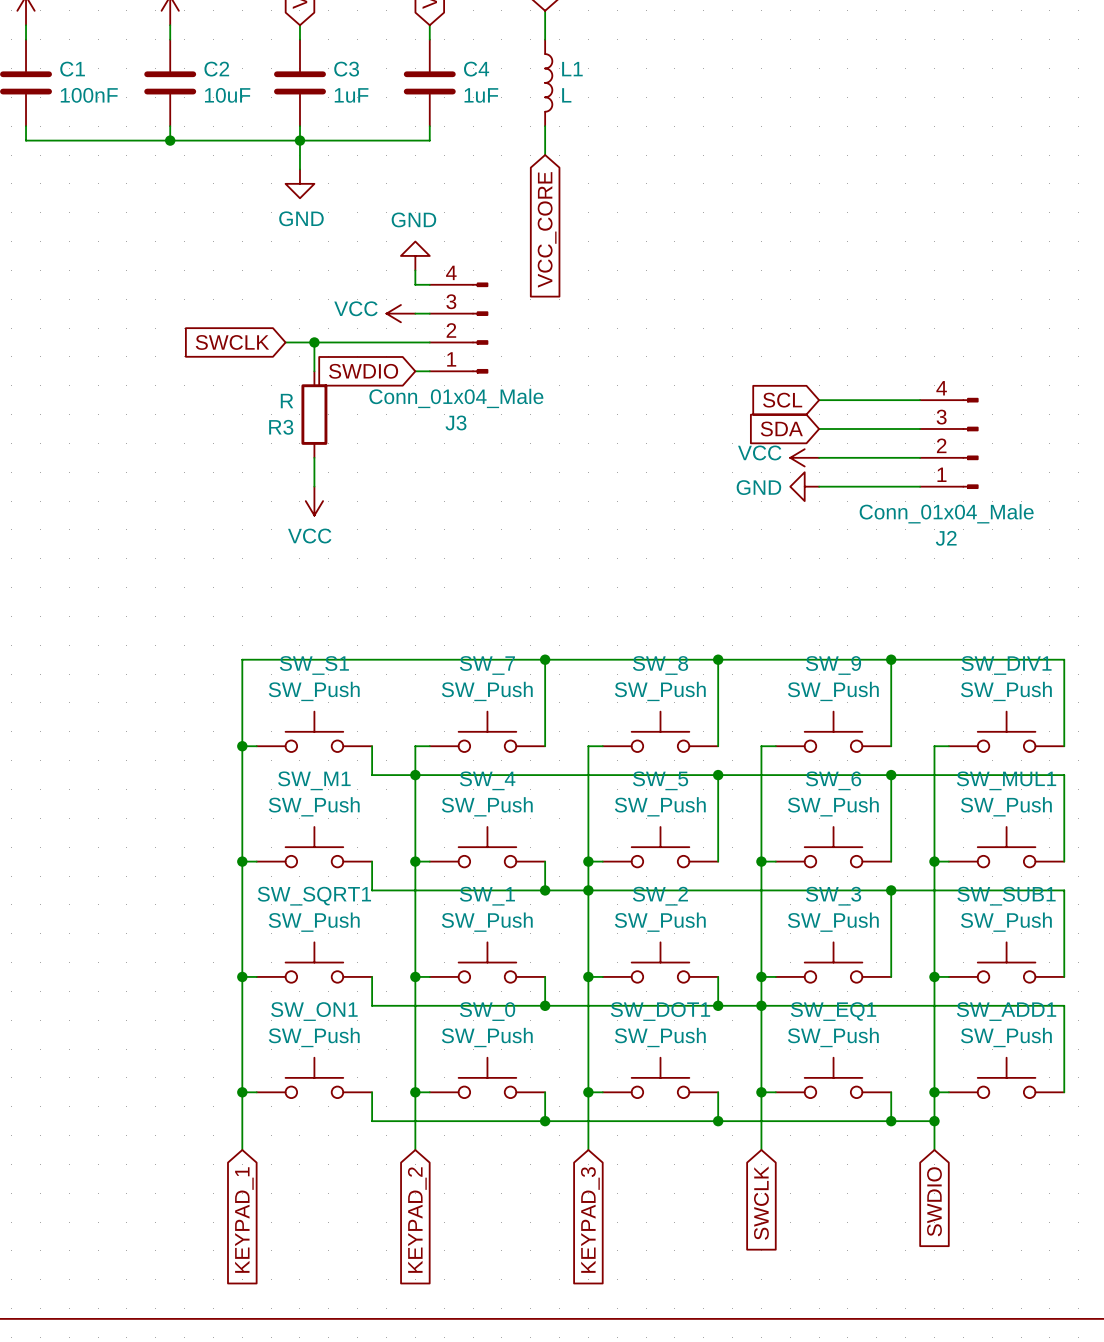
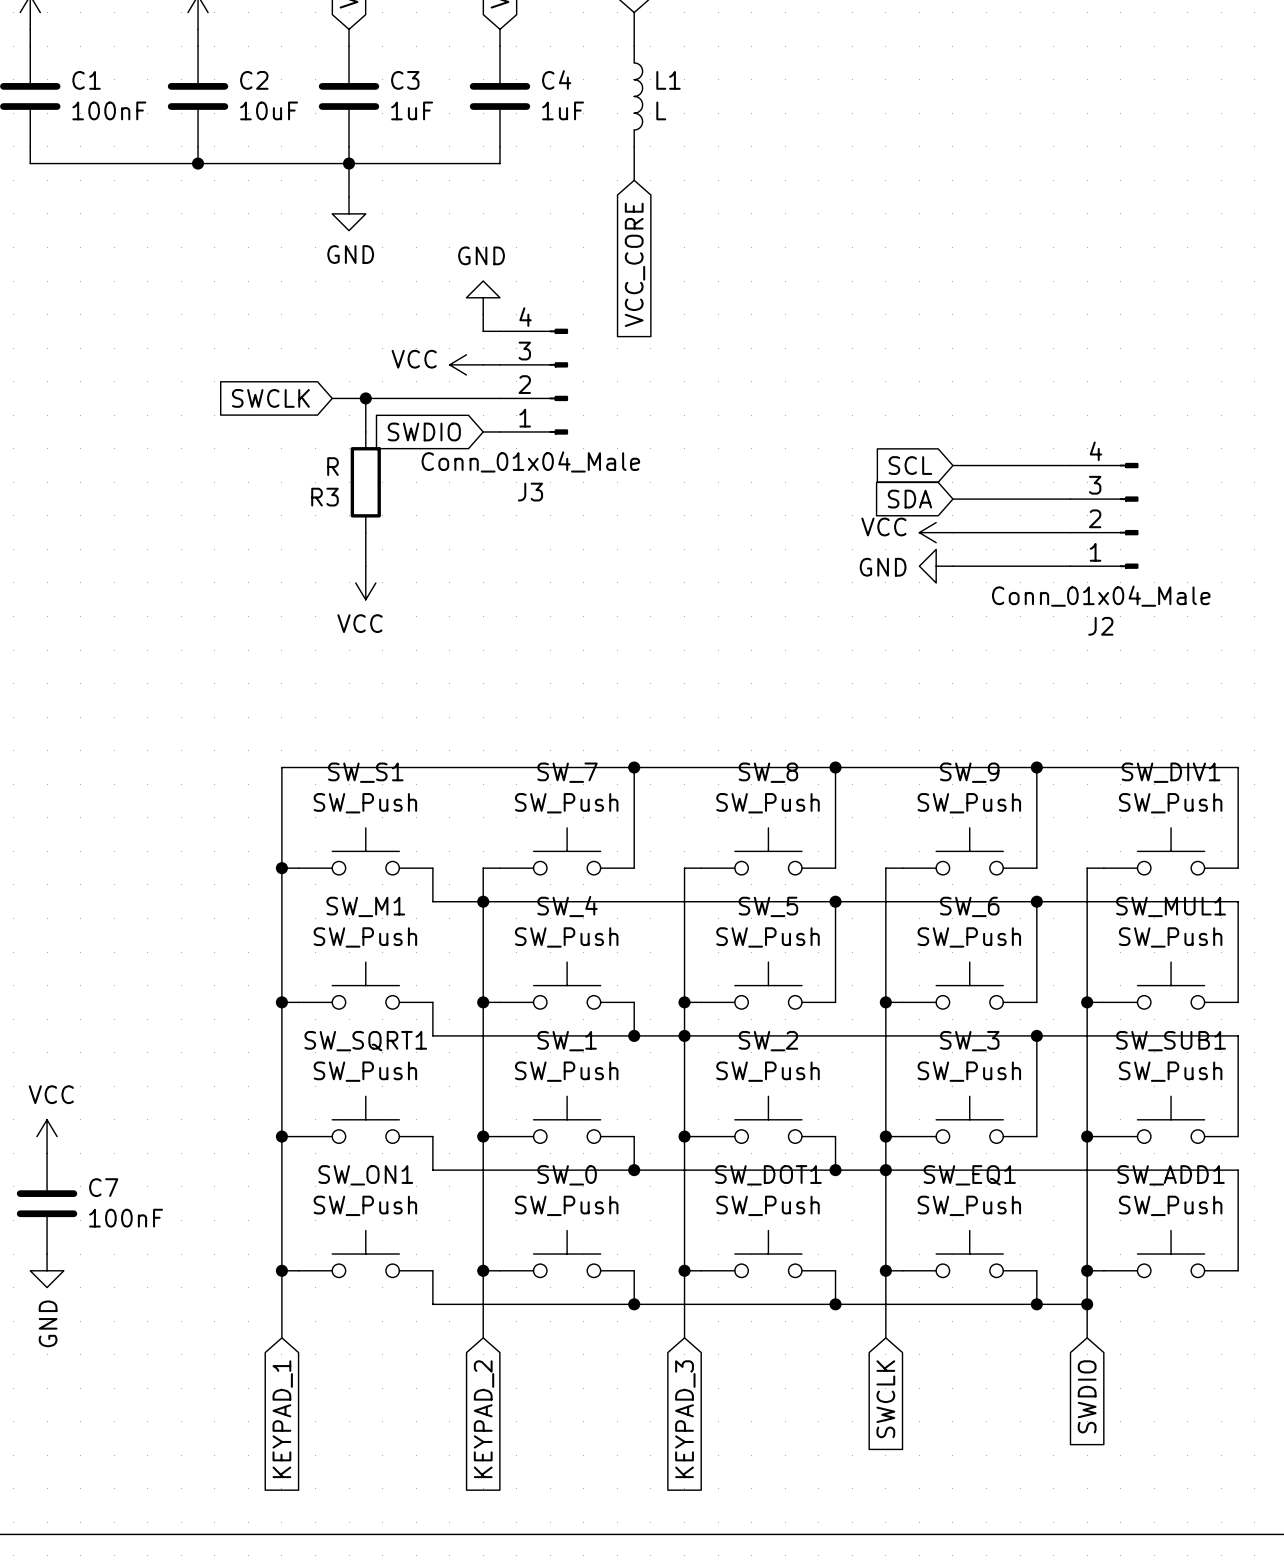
power symbol: none -> VCC (47, 1136)
C7: none -> 100nF (47, 1203)
power symbol: none -> GND (47, 1270)

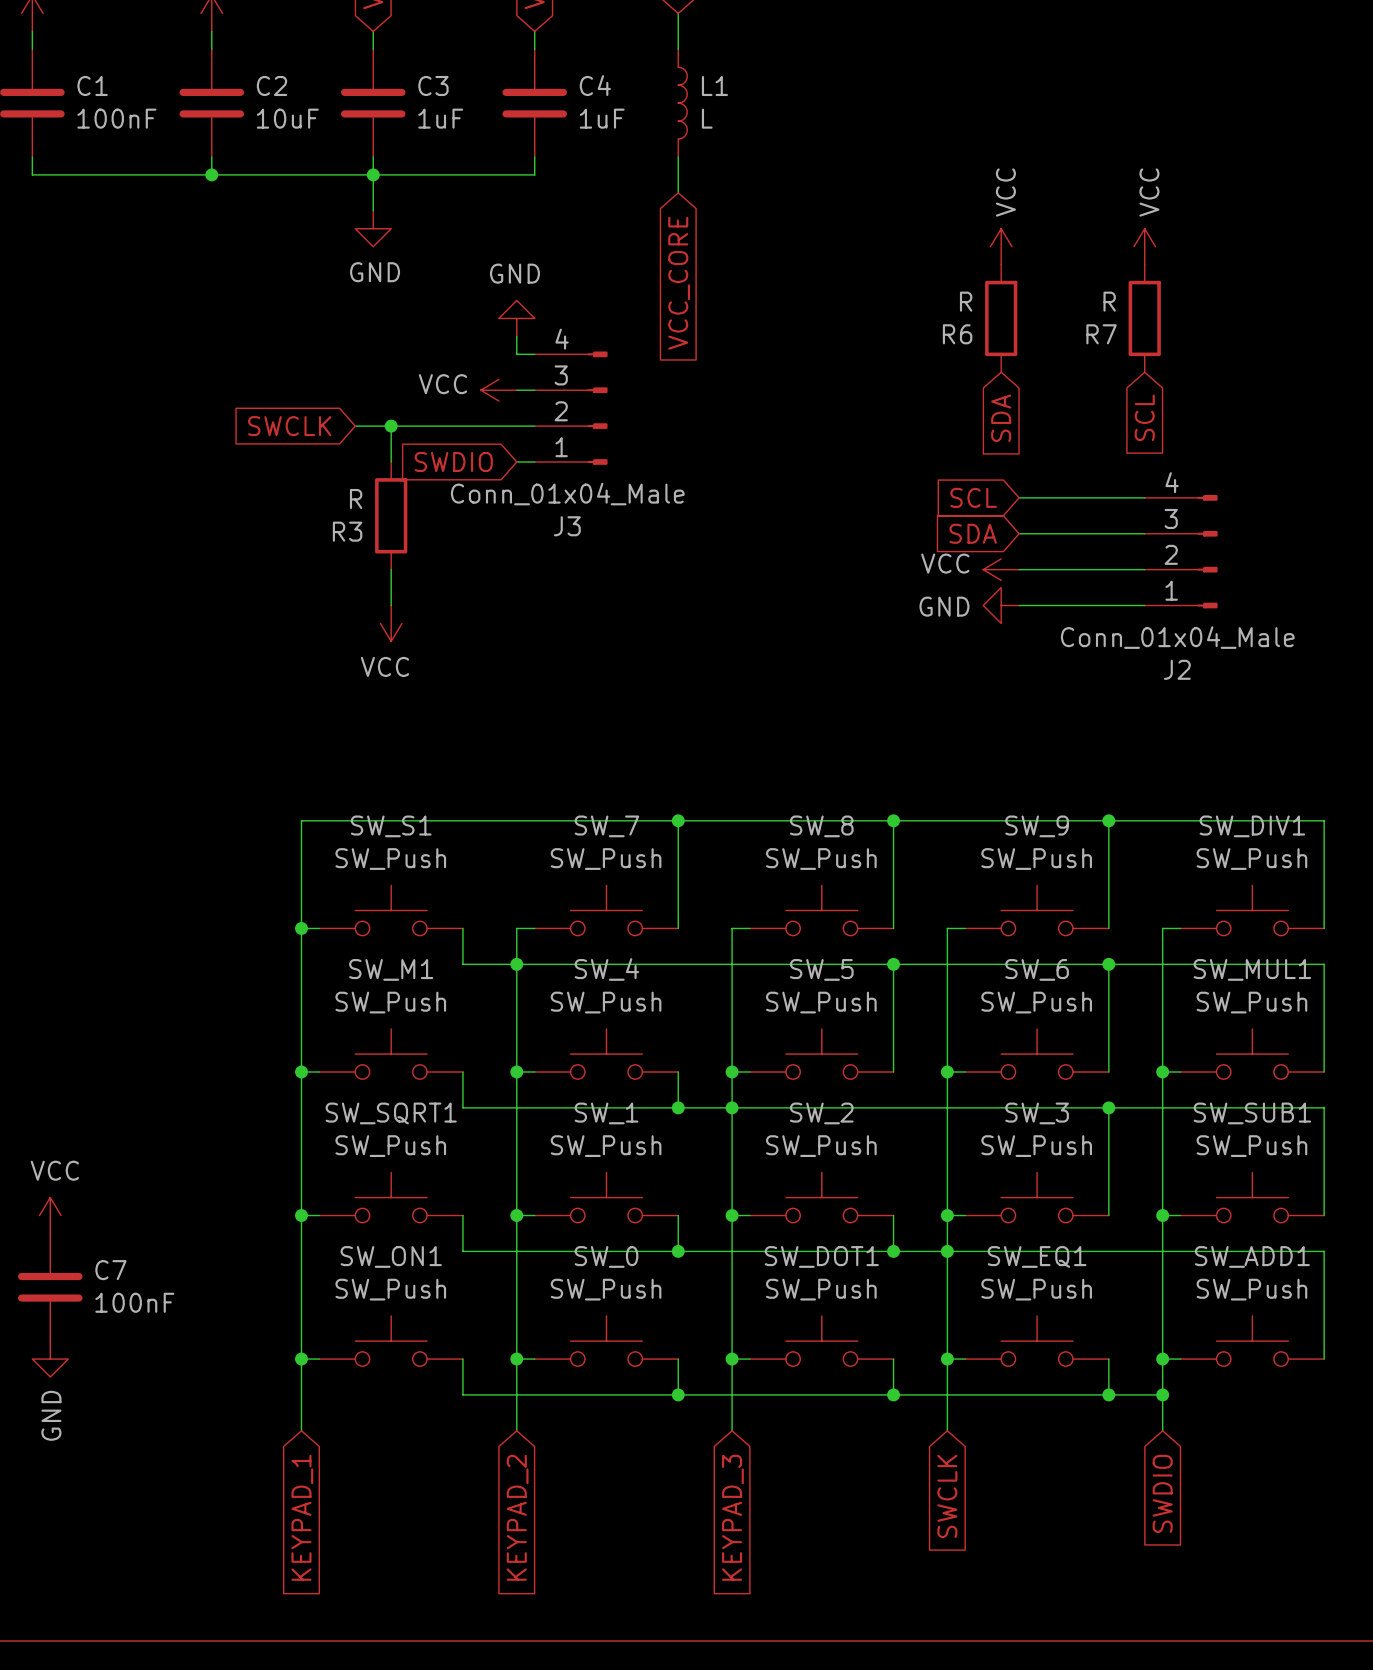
power symbol: none -> VCC (1001, 246)
power symbol: none -> VCC (1144, 246)
R6: none -> R (1001, 318)
R7: none -> R (1144, 318)
global label: none -> SCL (1144, 417)
global label: none -> SDA (1001, 418)

